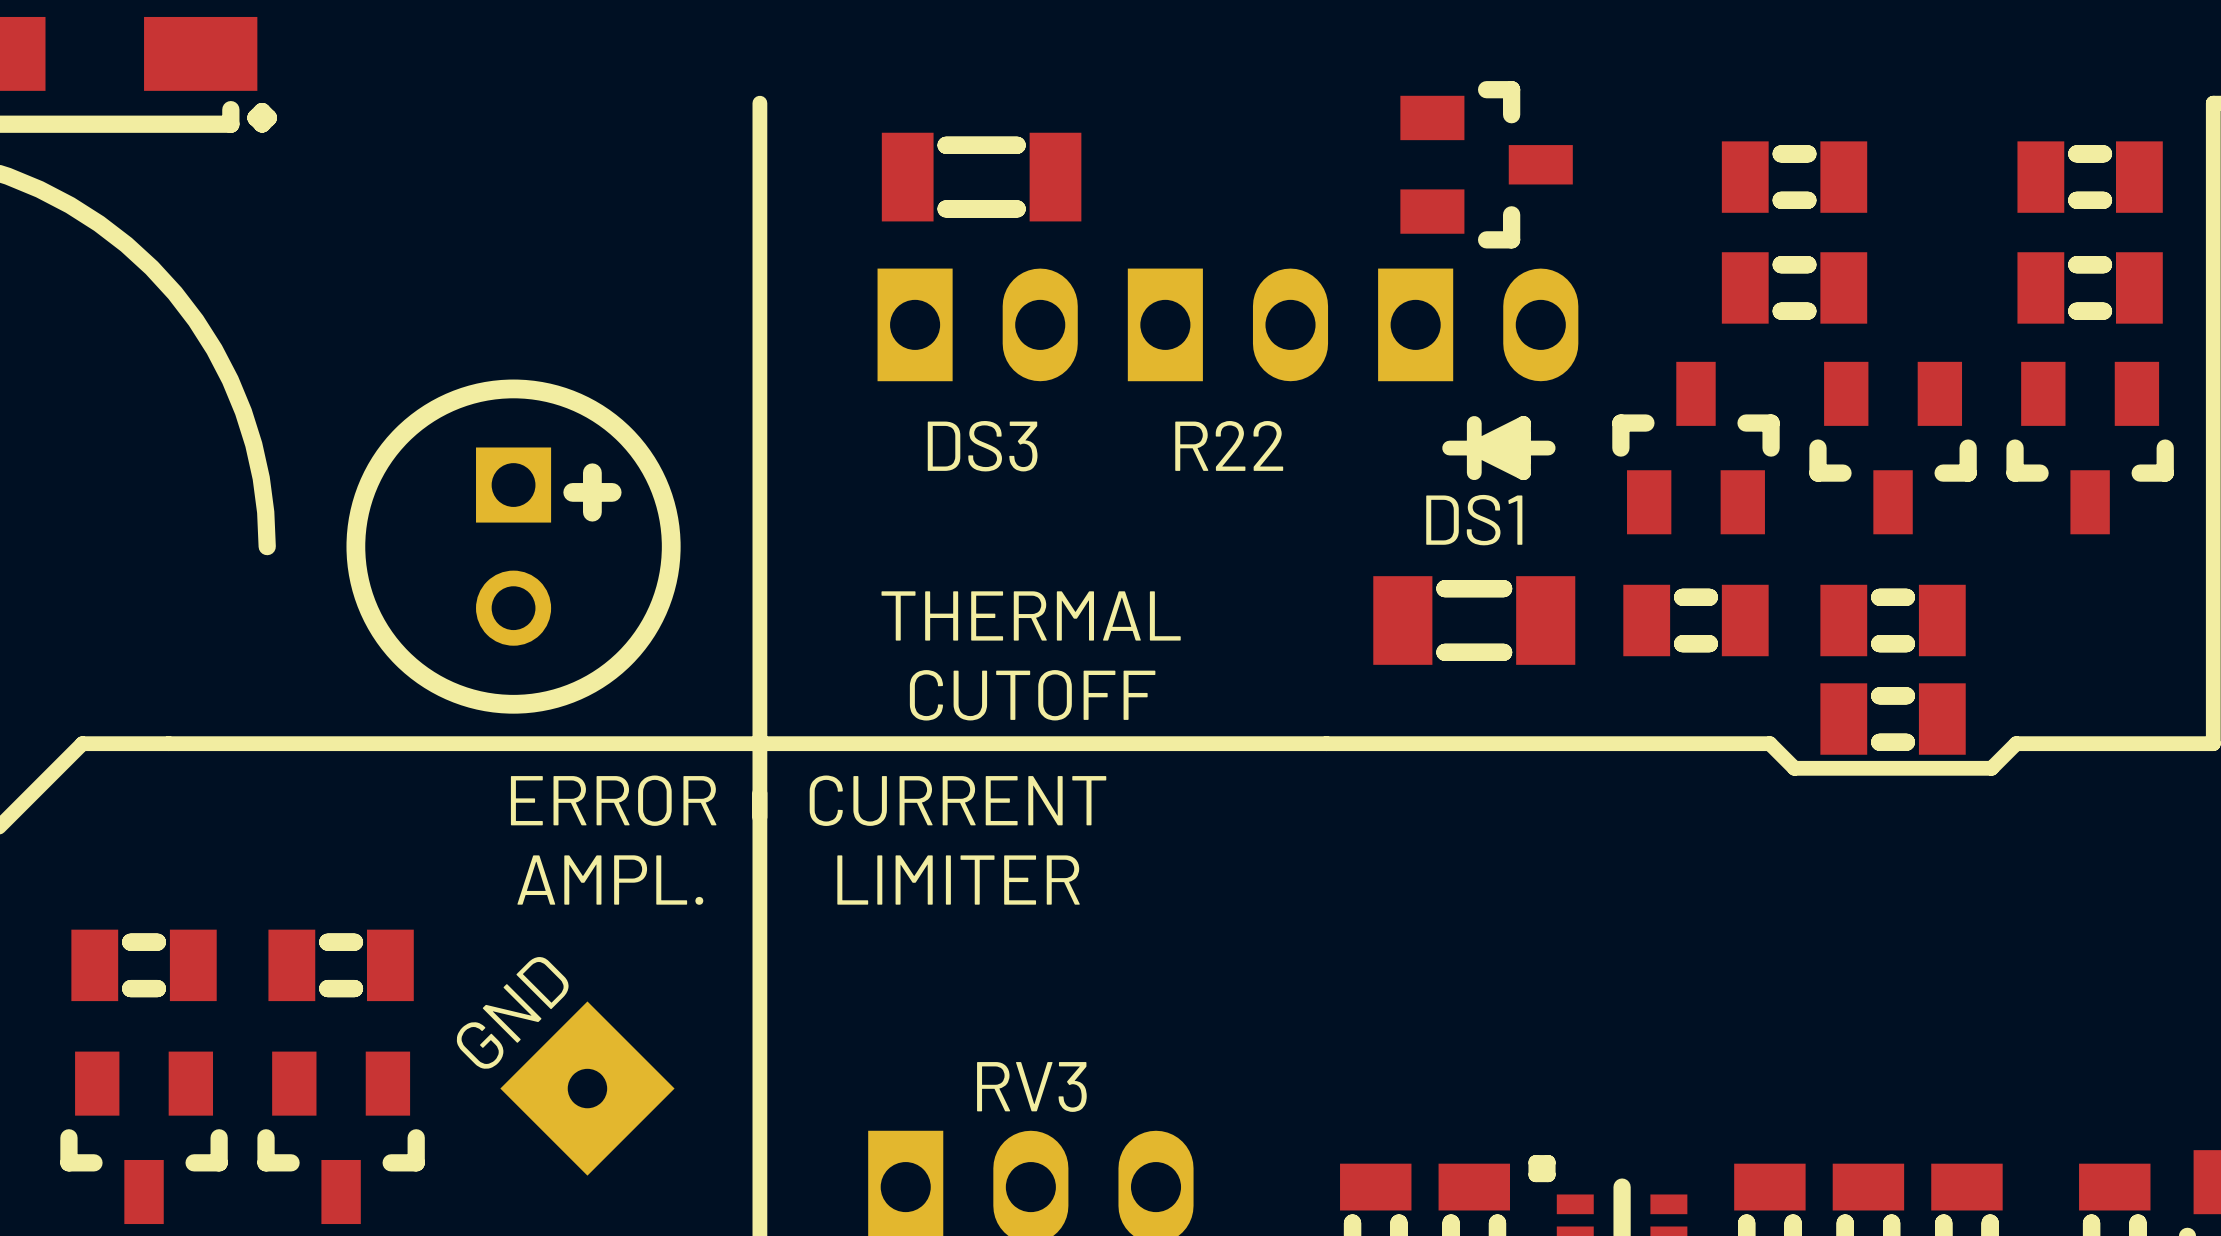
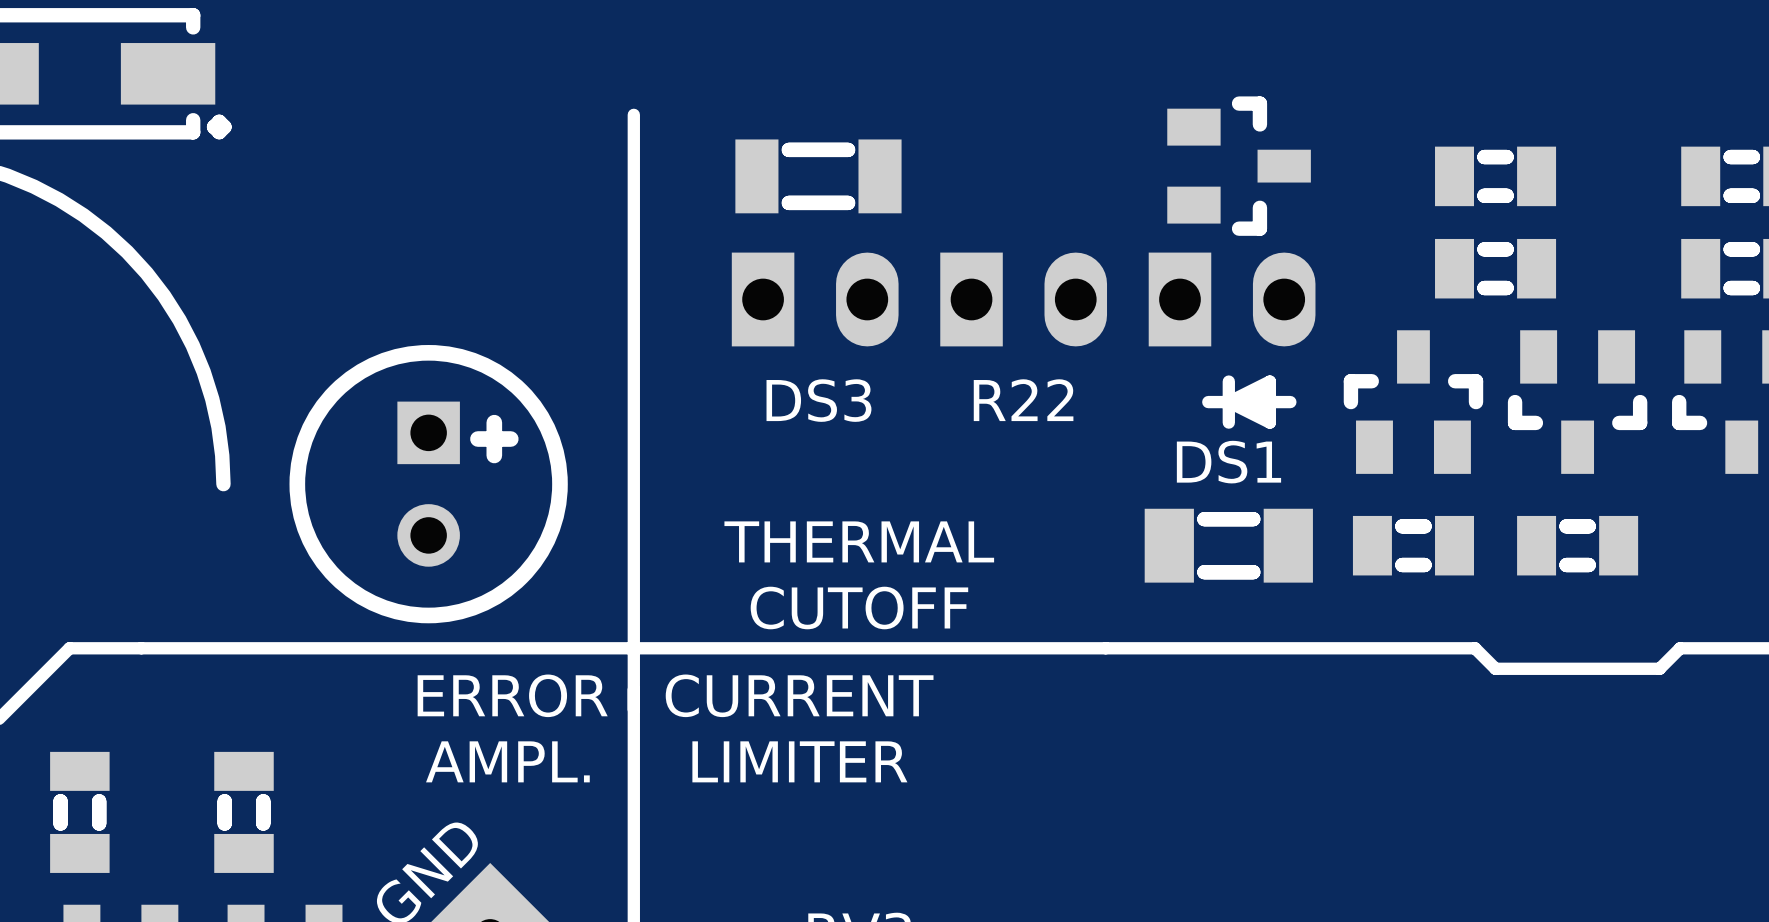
part: (1893, 719) -> none
part rotation: 0° (144, 965) -> 90° clockwise (79, 812)
part rotation: 0° (341, 965) -> 90° clockwise (243, 812)

